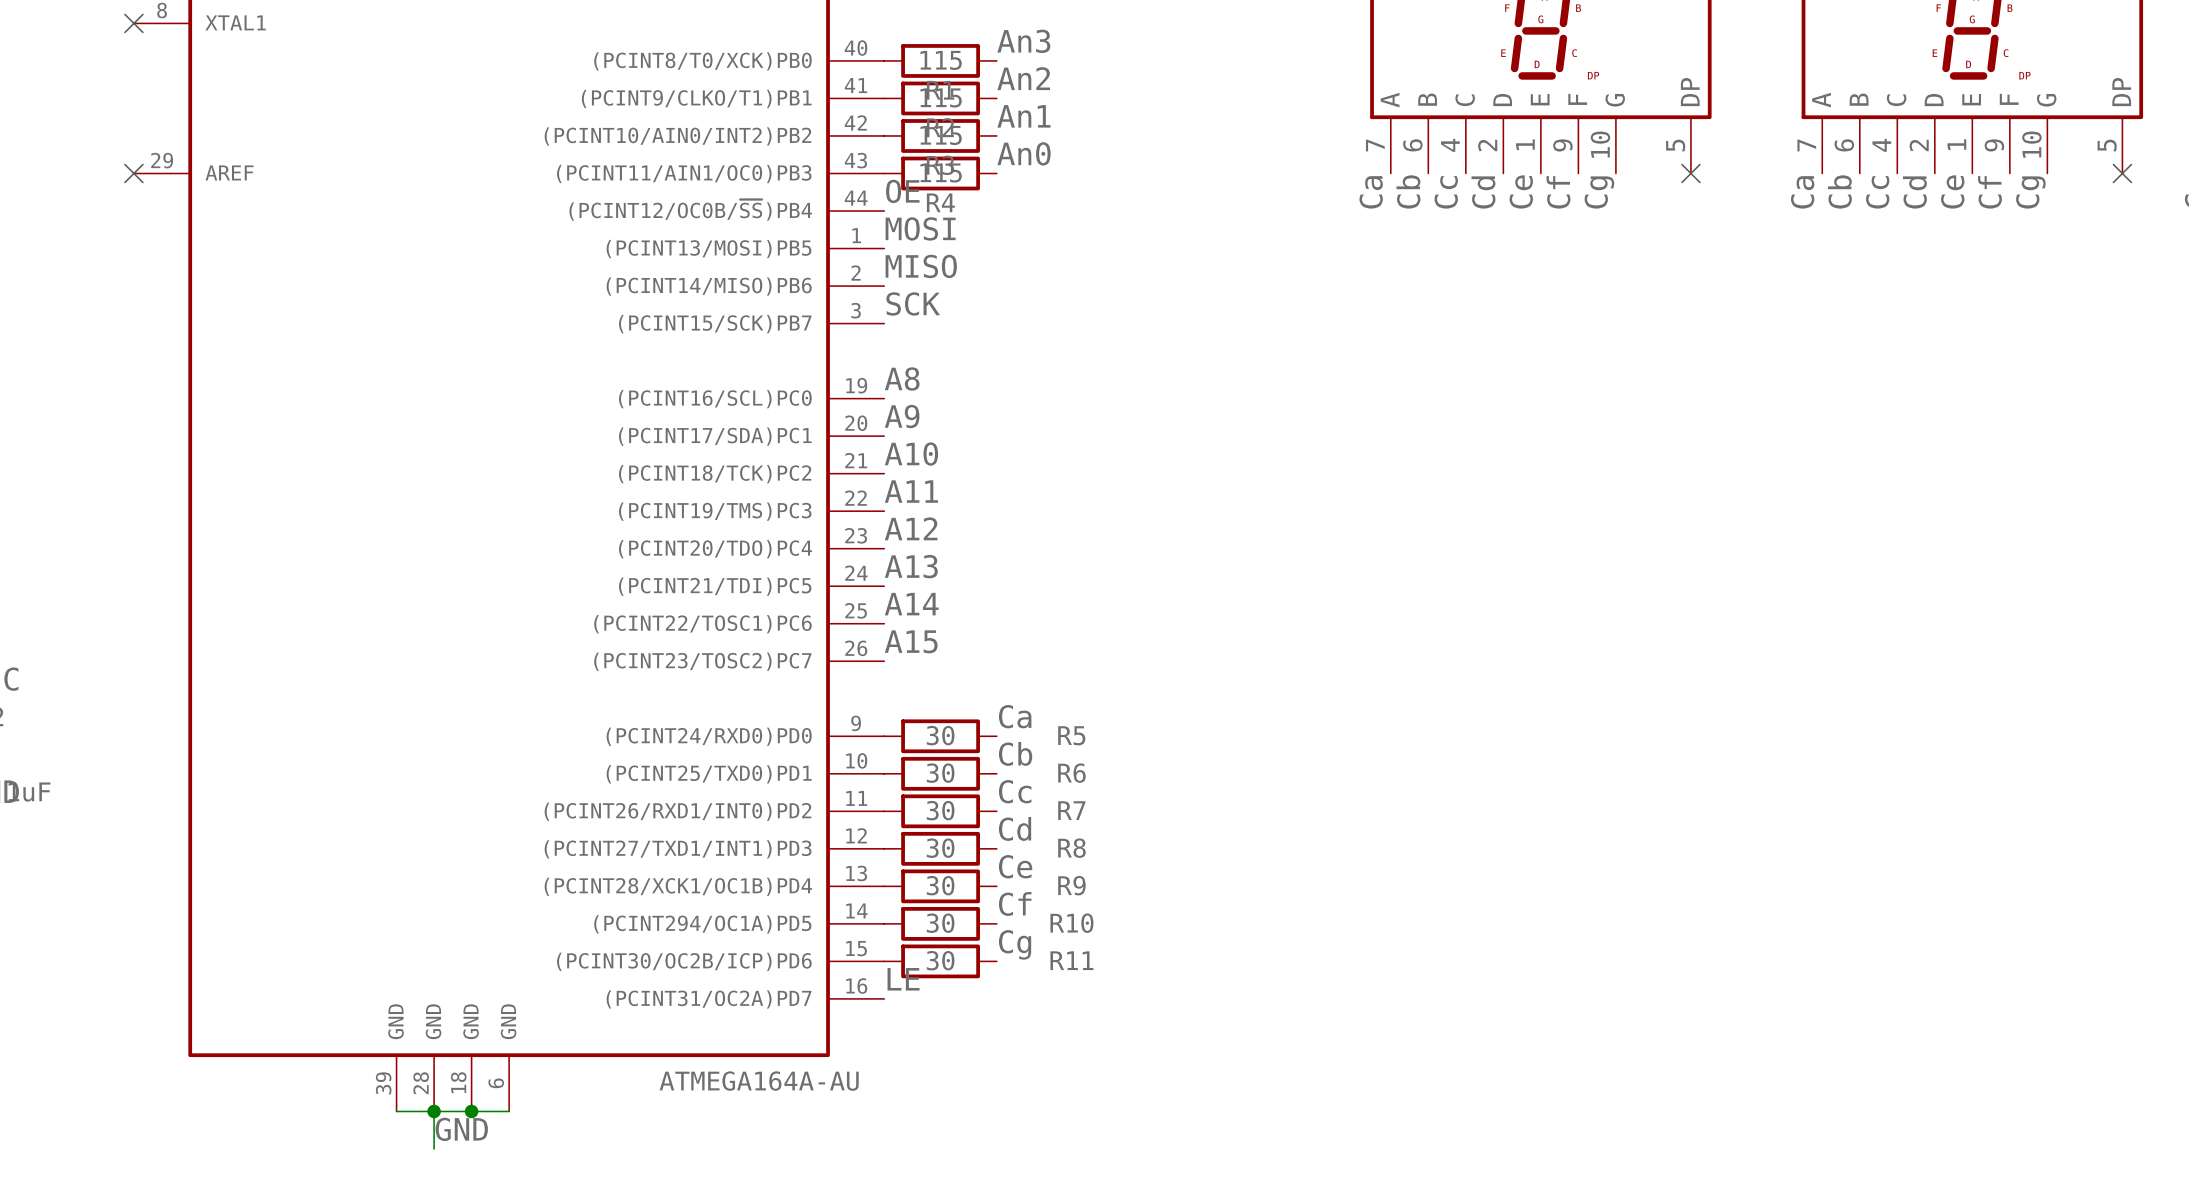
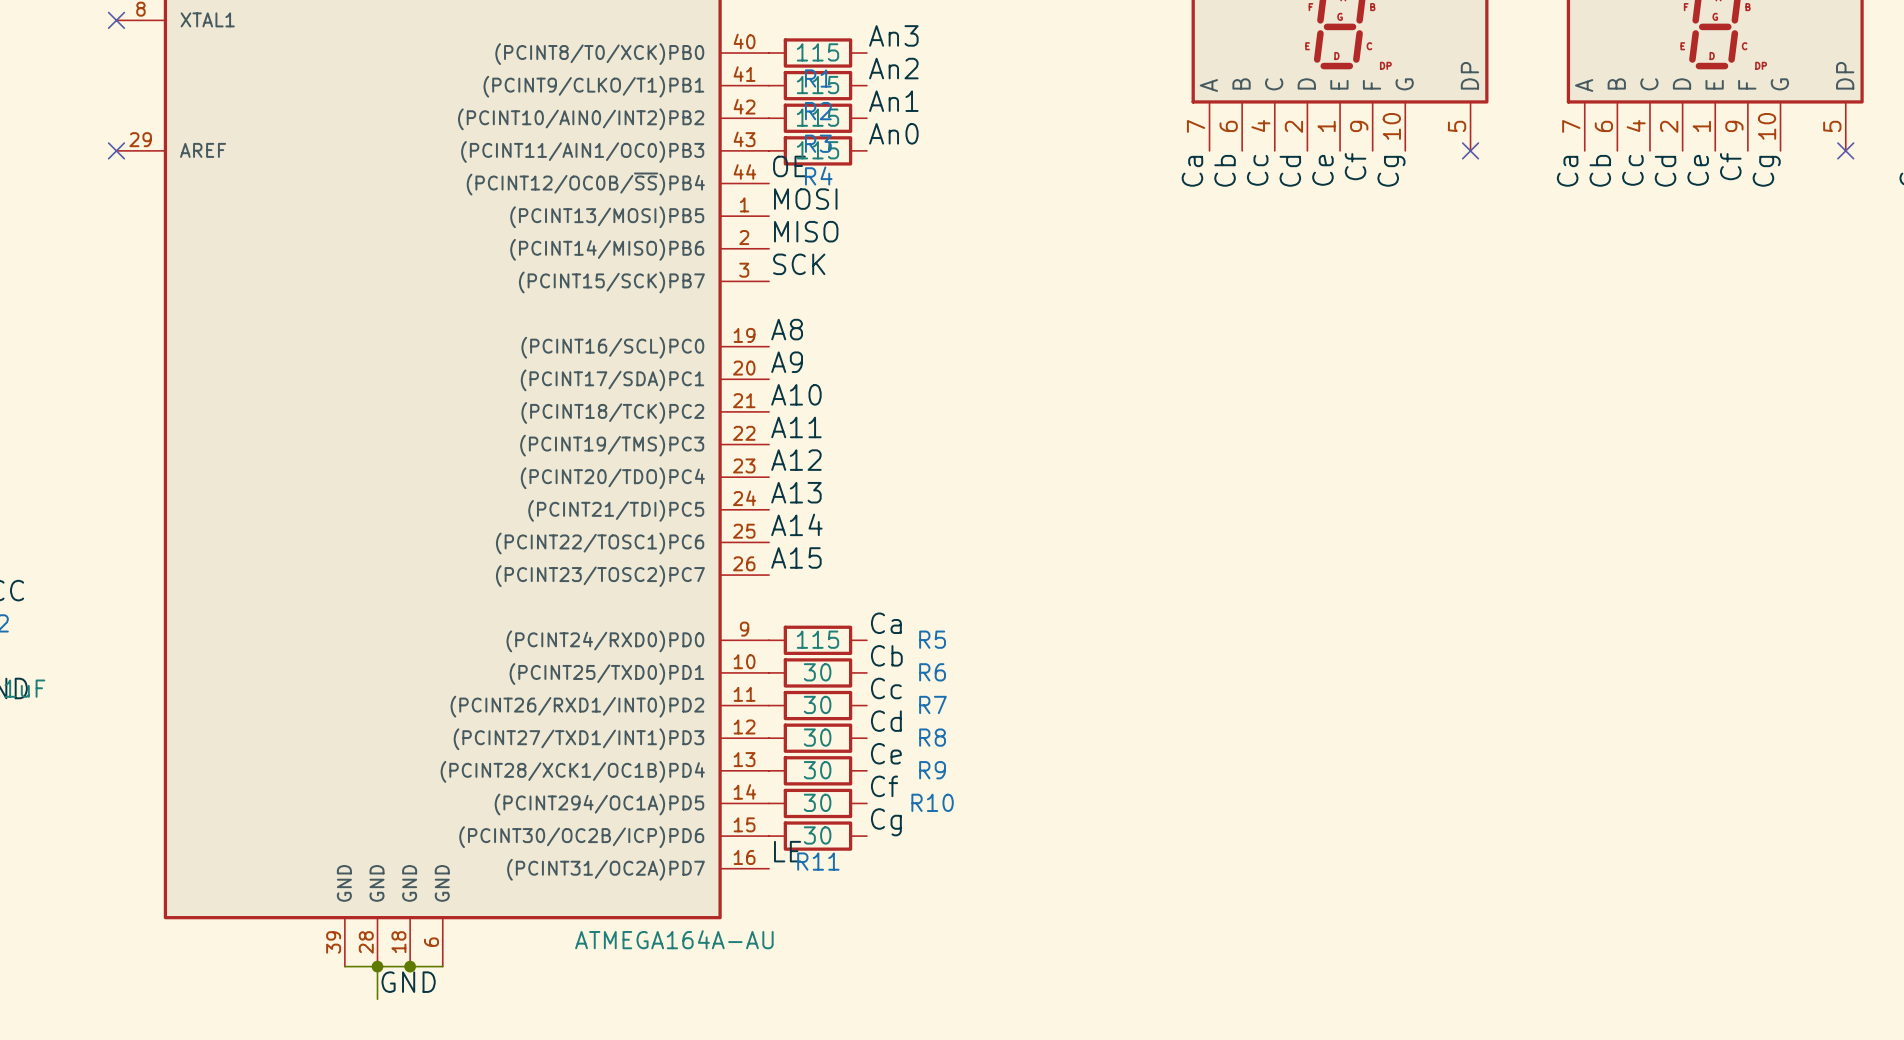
R5 value: 30 (940, 735) -> 115 (817, 639)
R11 name position: R11 (1071, 960) -> R11 (818, 861)

